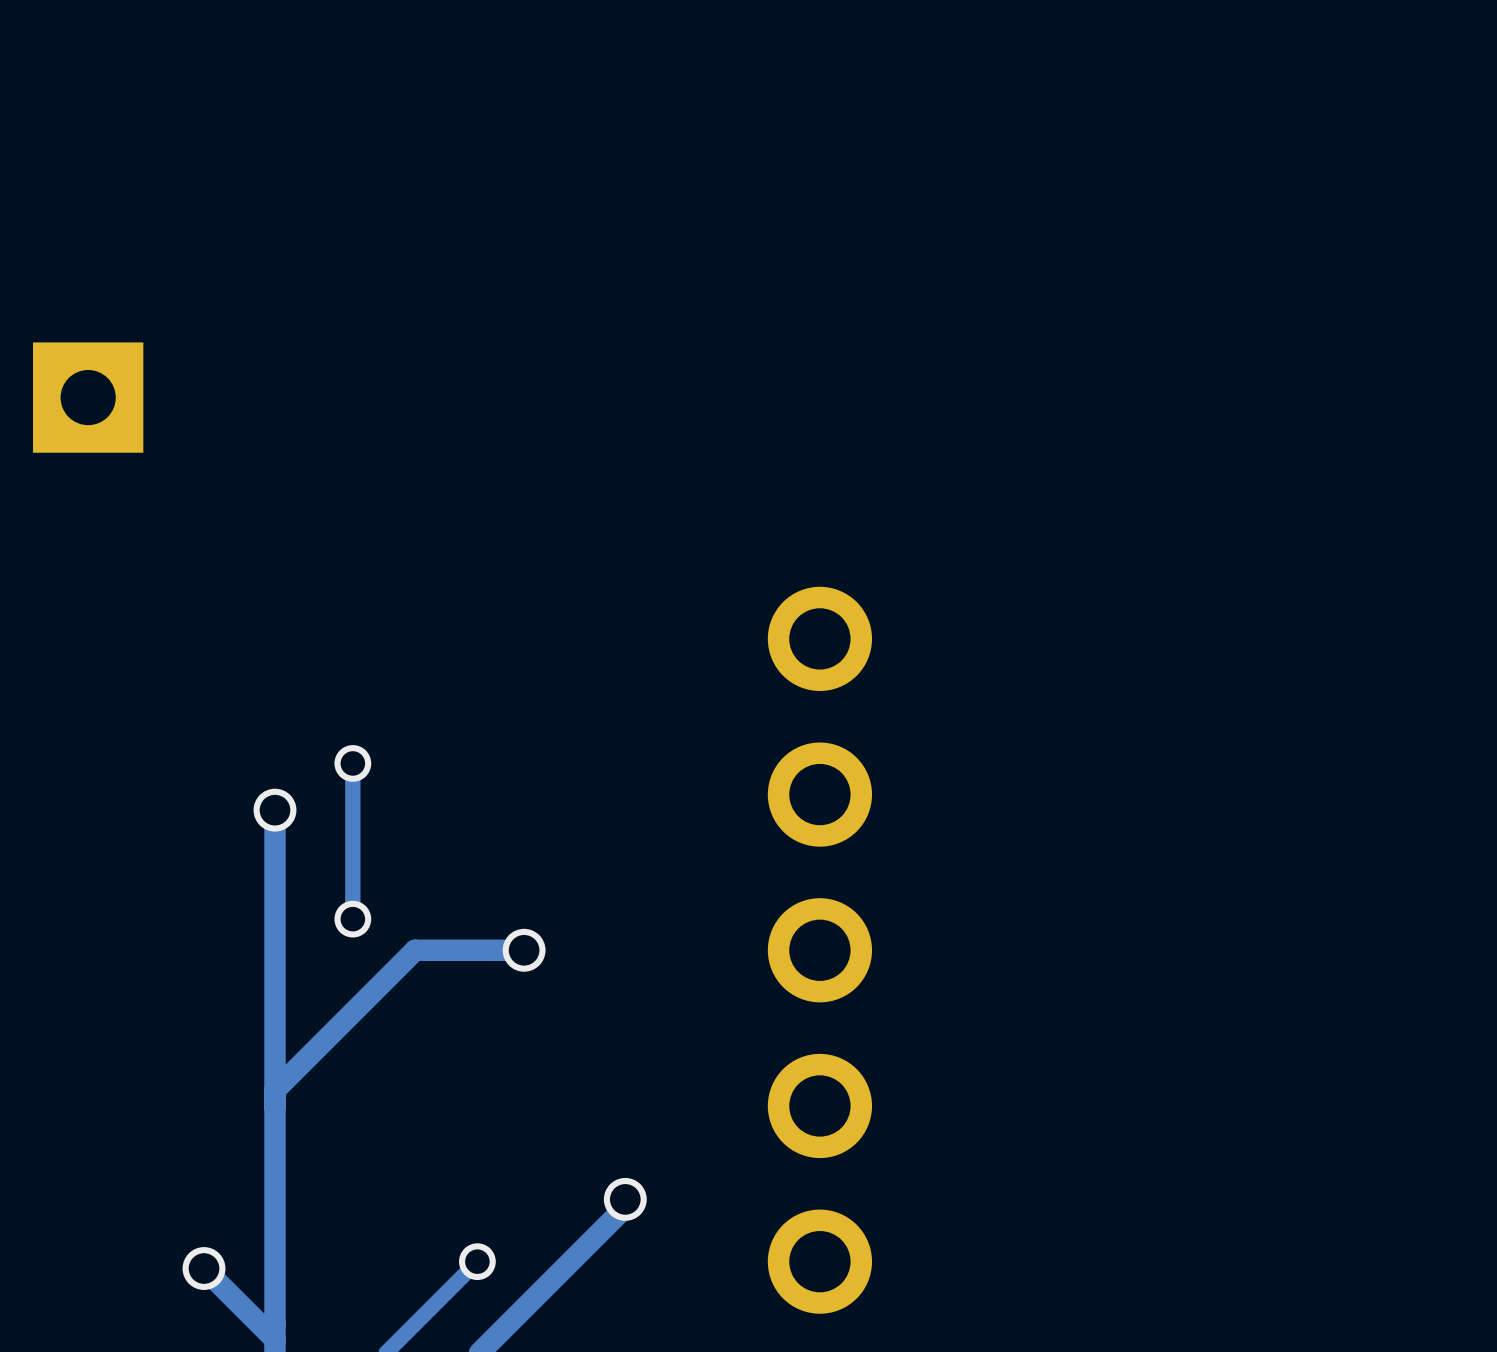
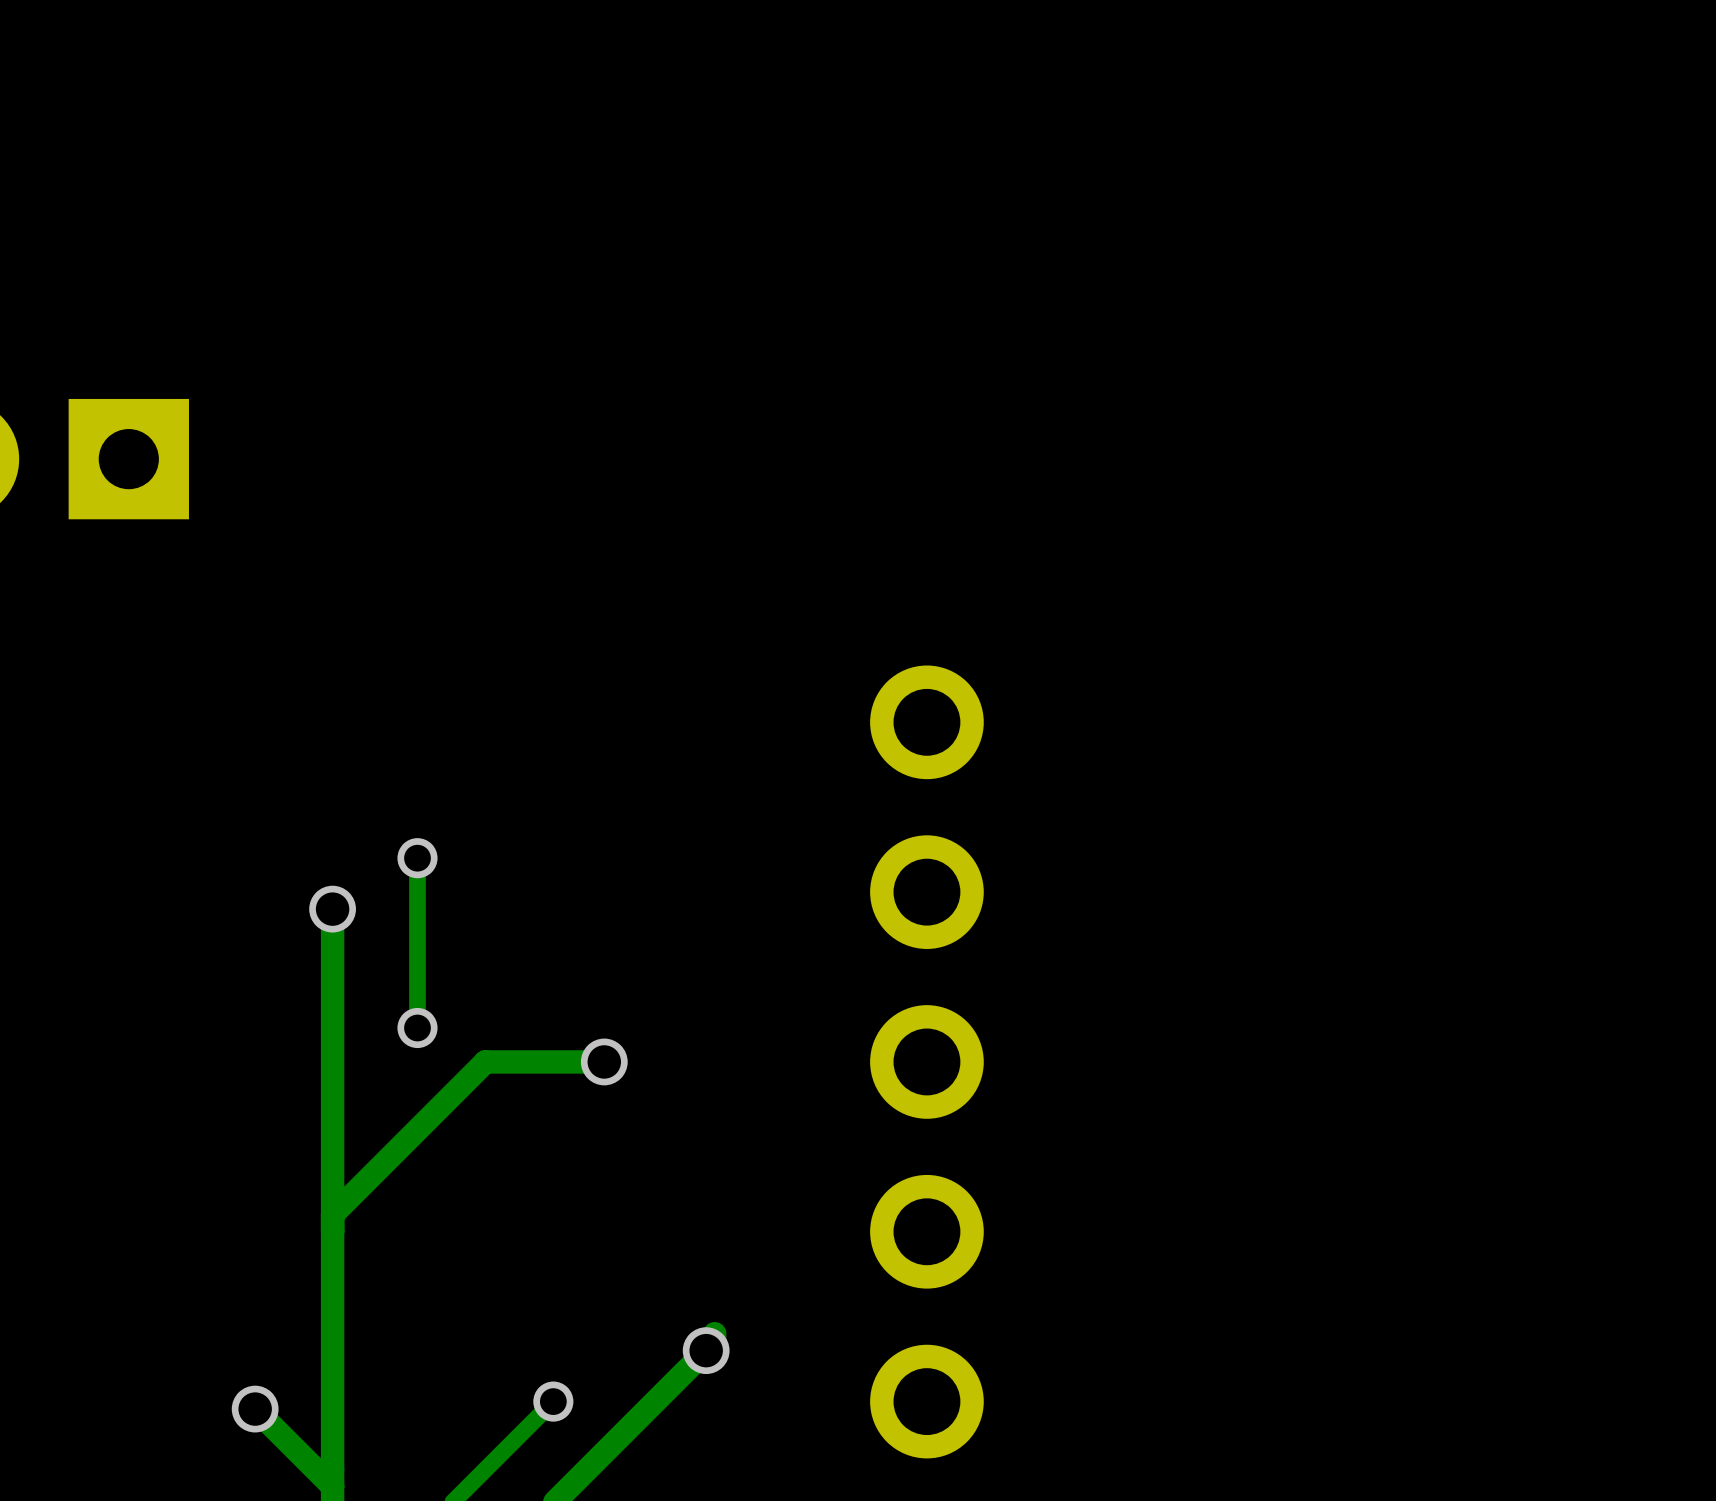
via position: (625, 1199) -> (706, 1350)

